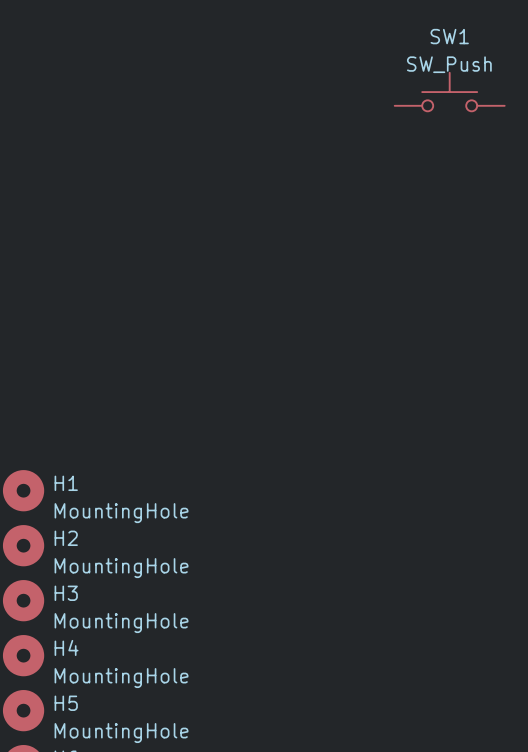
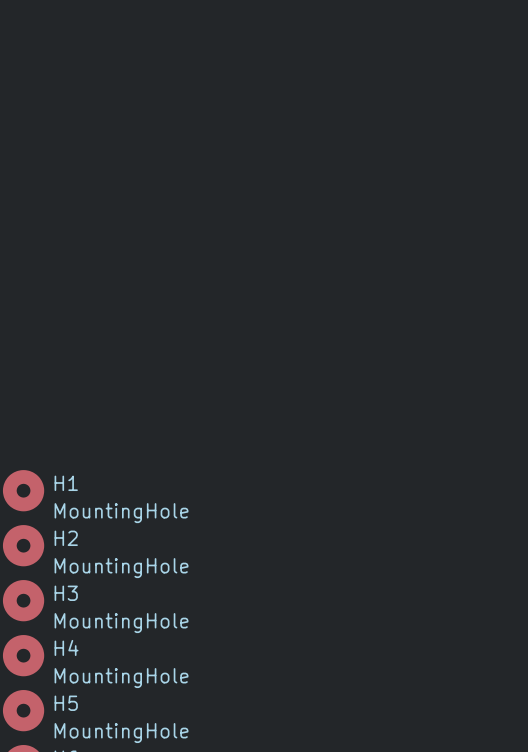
SW1: SW_Push (449, 92) -> none

